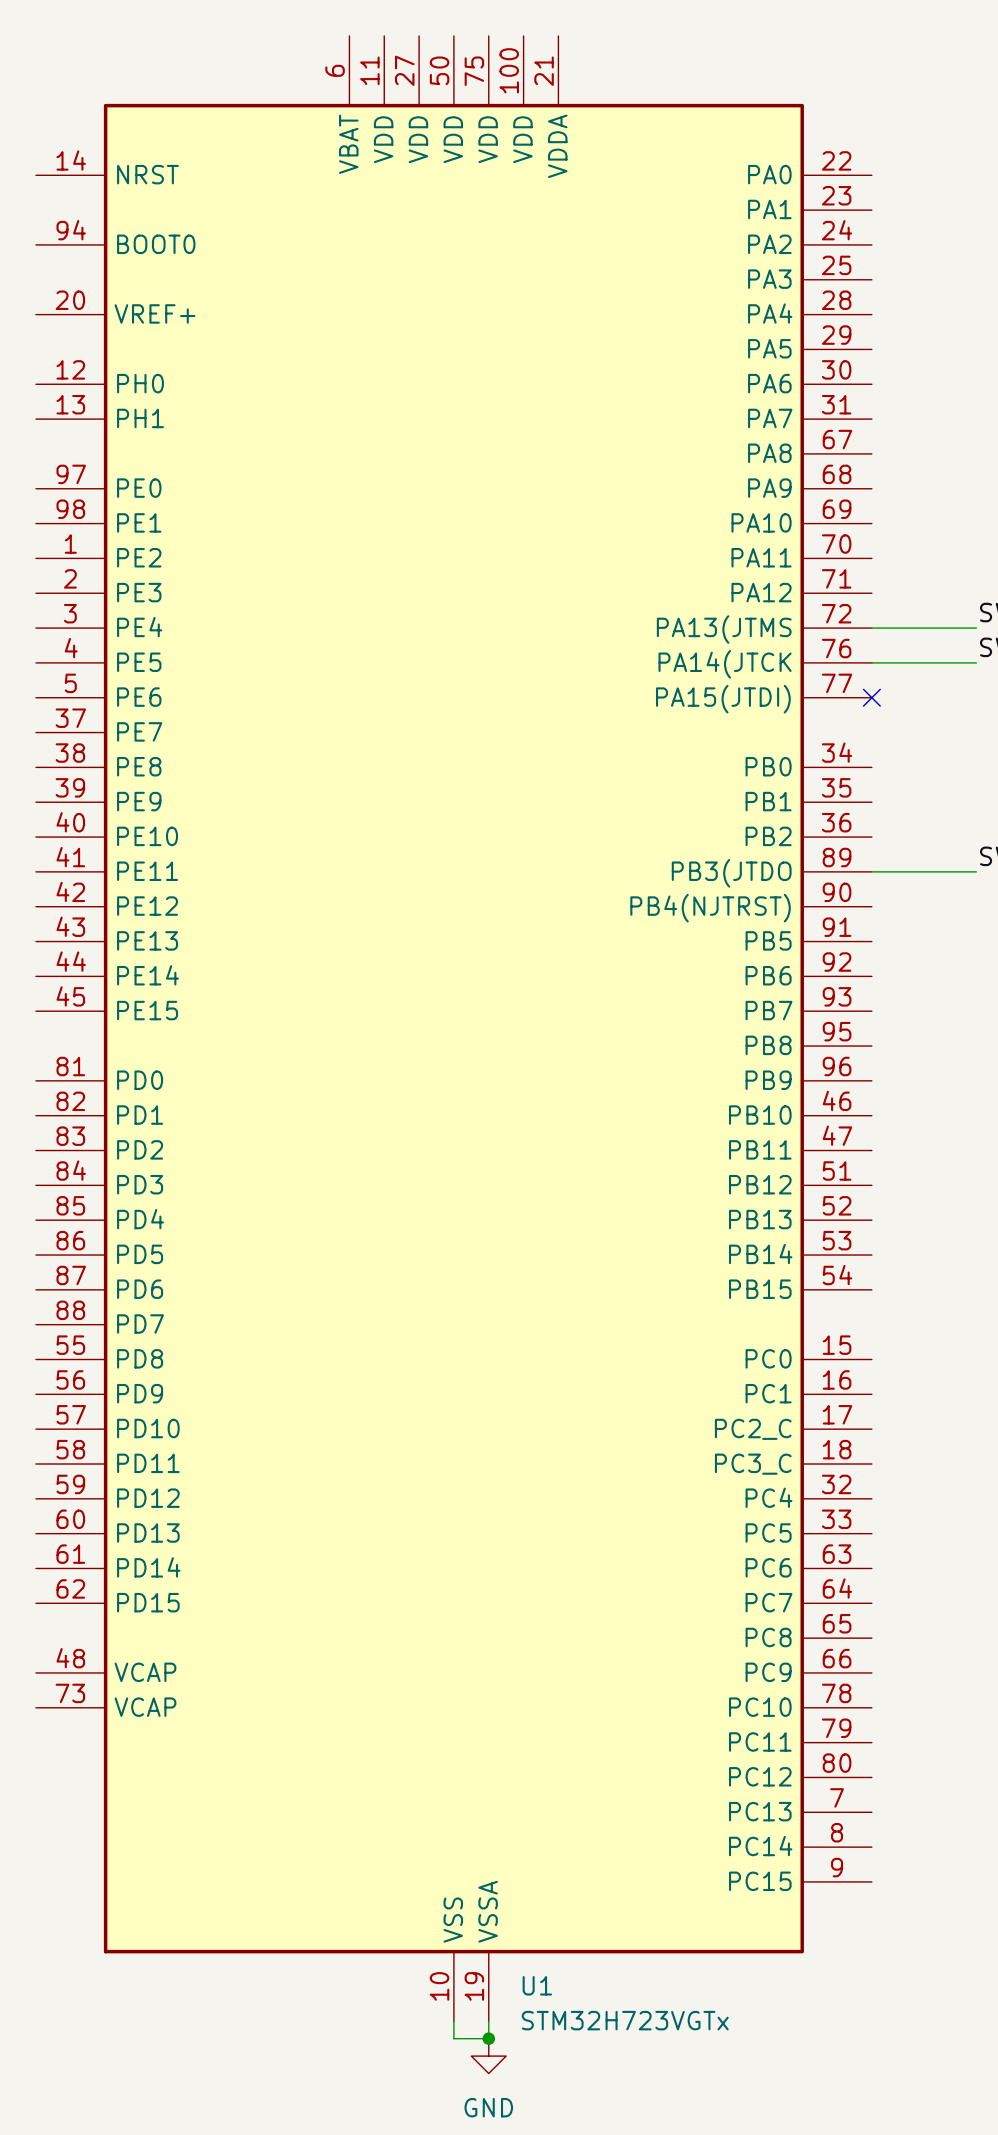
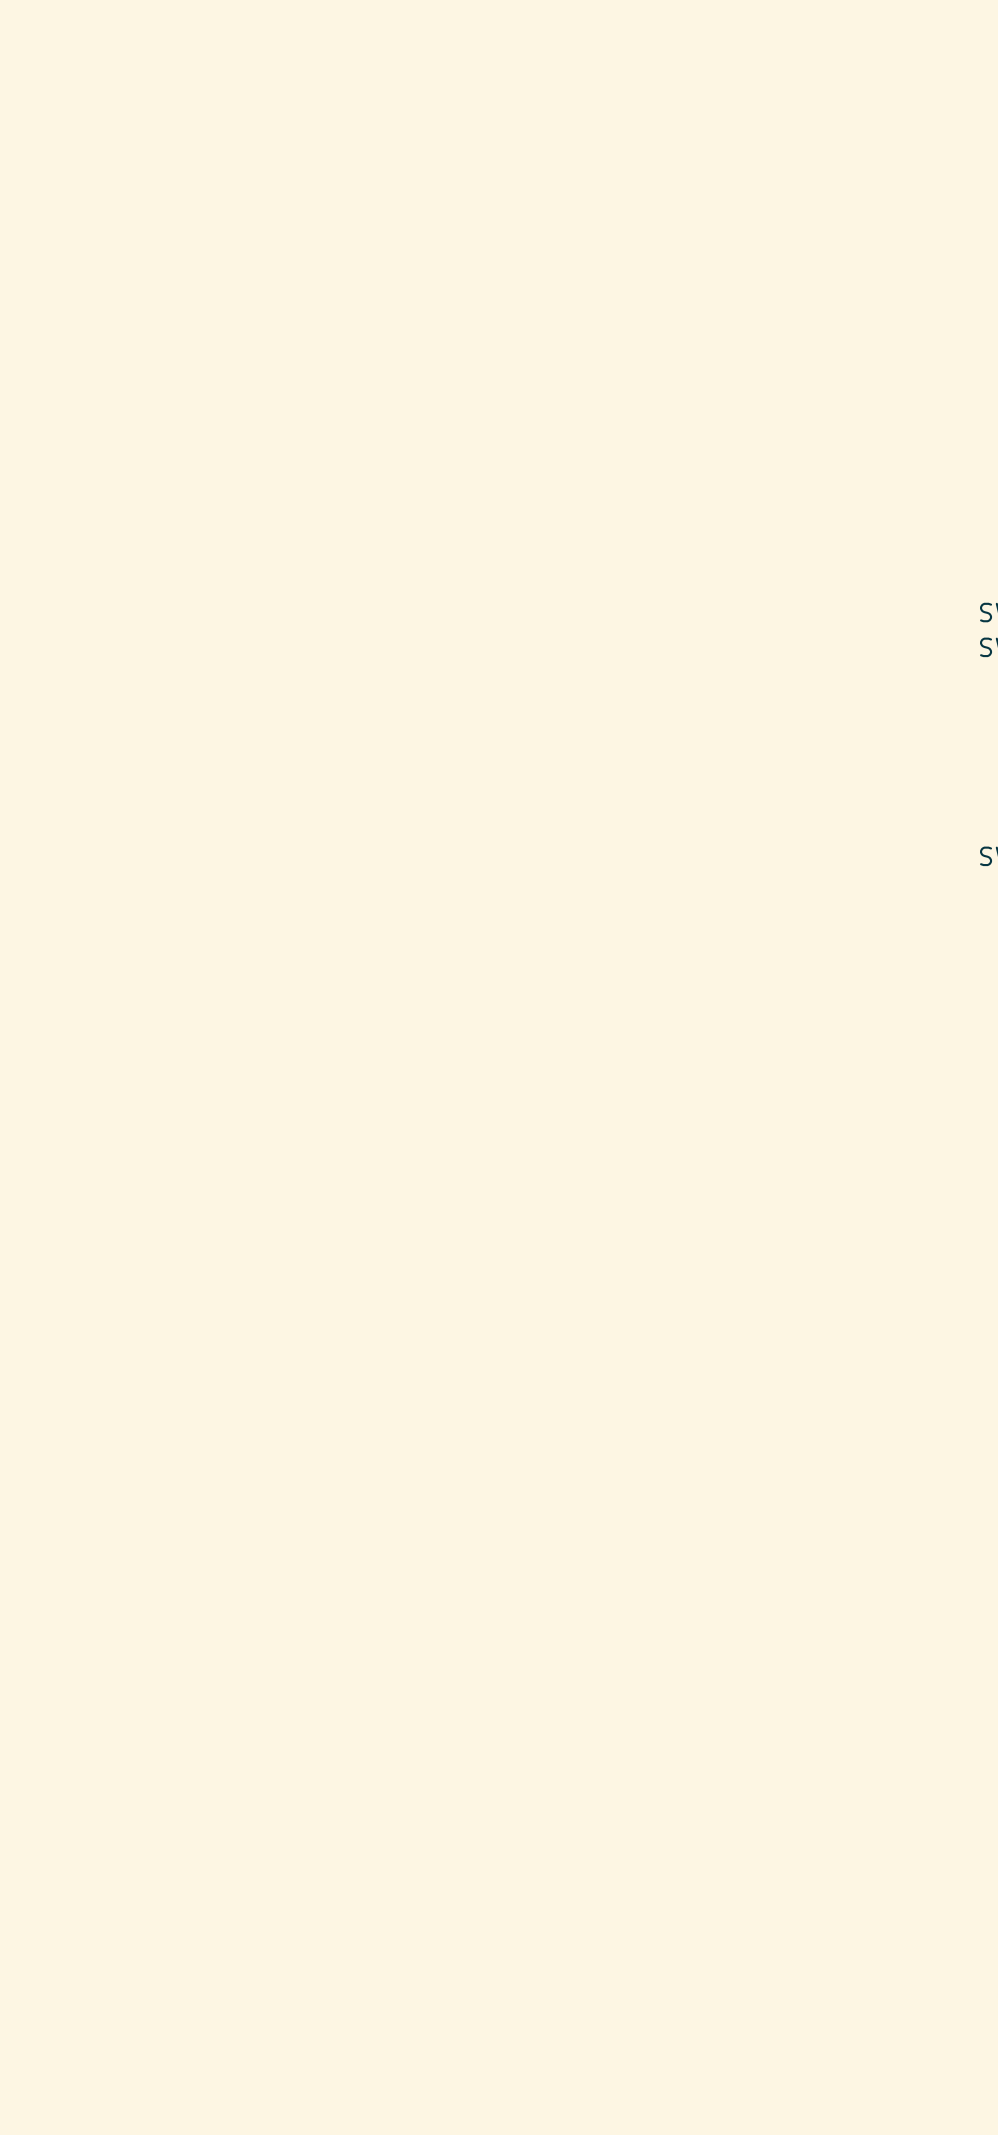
wire: (871, 628) (976, 628) -> none
wire: (871, 662) (976, 662) -> none
no-connect mark: (871, 697) -> none
wire: (871, 871) (976, 871) -> none
U1: STM32H723VGTx (453, 1028) -> none
wire: (453, 2021) (453, 2038) (488, 2038) (488, 2021) -> none
junction: (488, 2038) -> none
power symbol: GND (488, 2056) -> none

